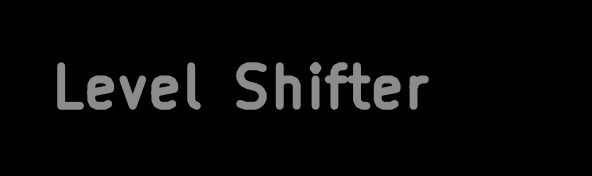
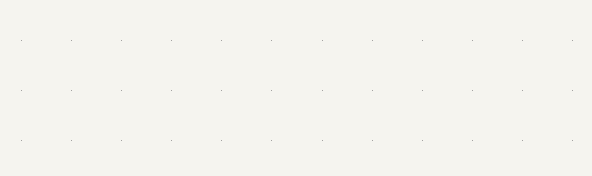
text: Level Shifter (243, 86) -> none

